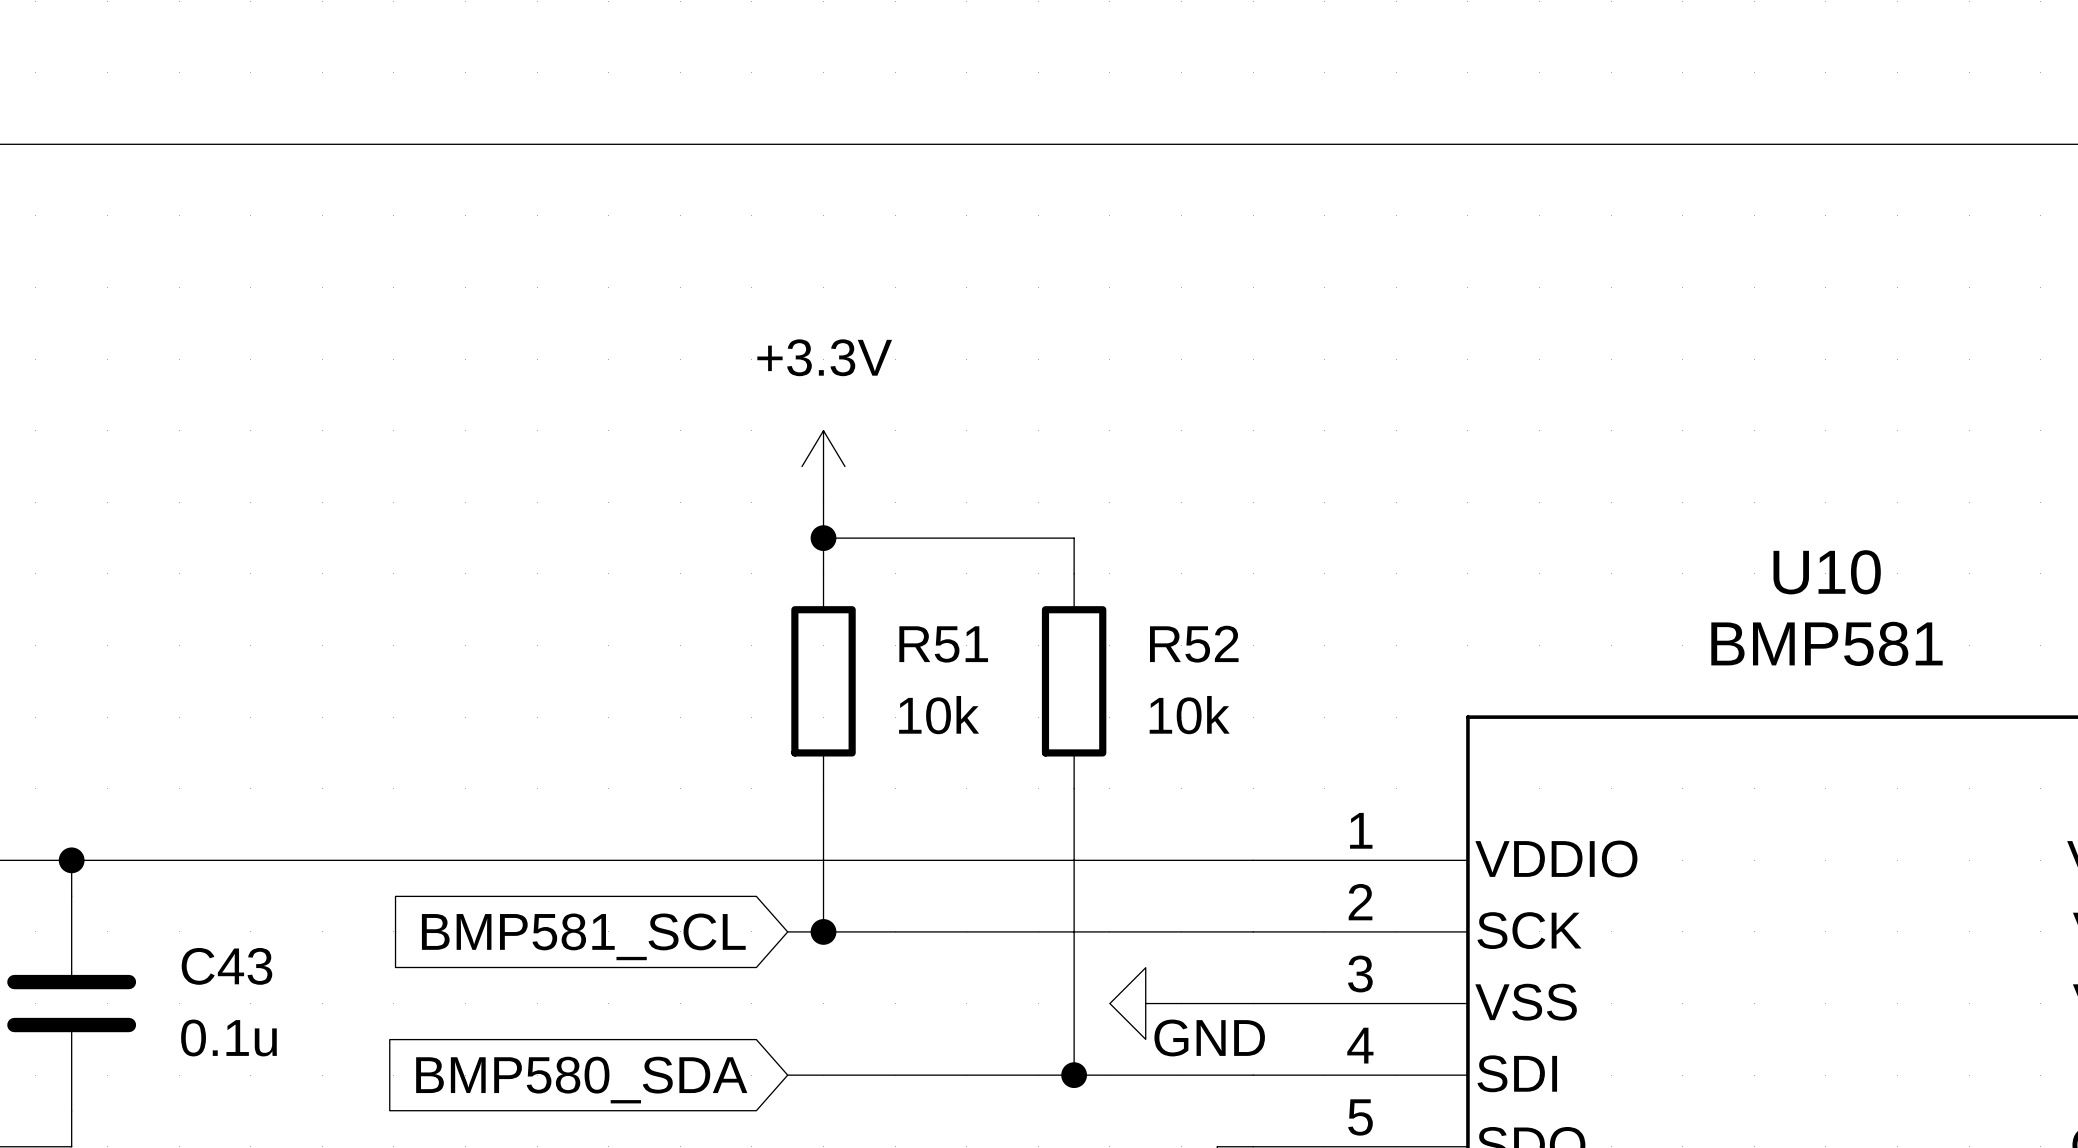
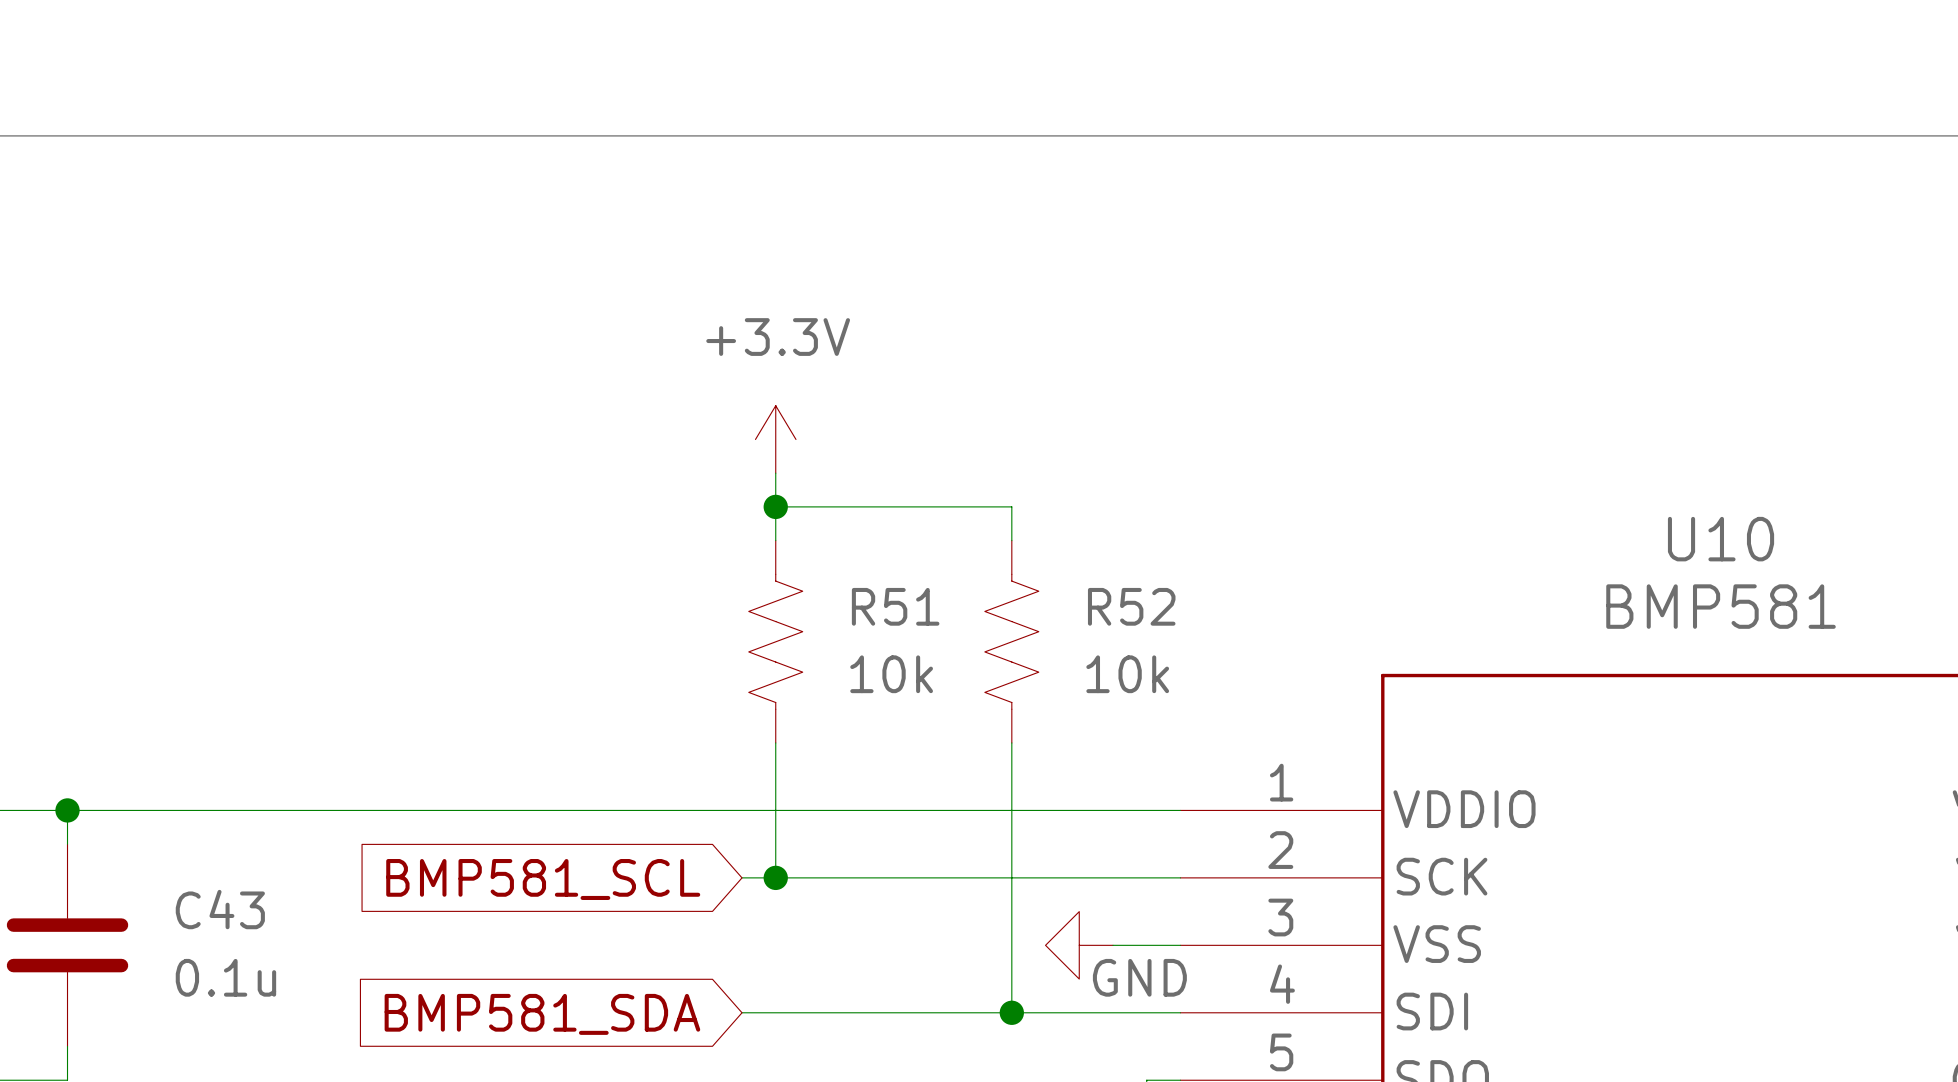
R51 symbol: [791, 573, 856, 789] -> [748, 540, 803, 743]
R52 symbol: [1041, 573, 1107, 789] -> [984, 540, 1039, 743]
global label: BMP580_SDA (581, 1080) -> BMP581_SDA (542, 1014)

